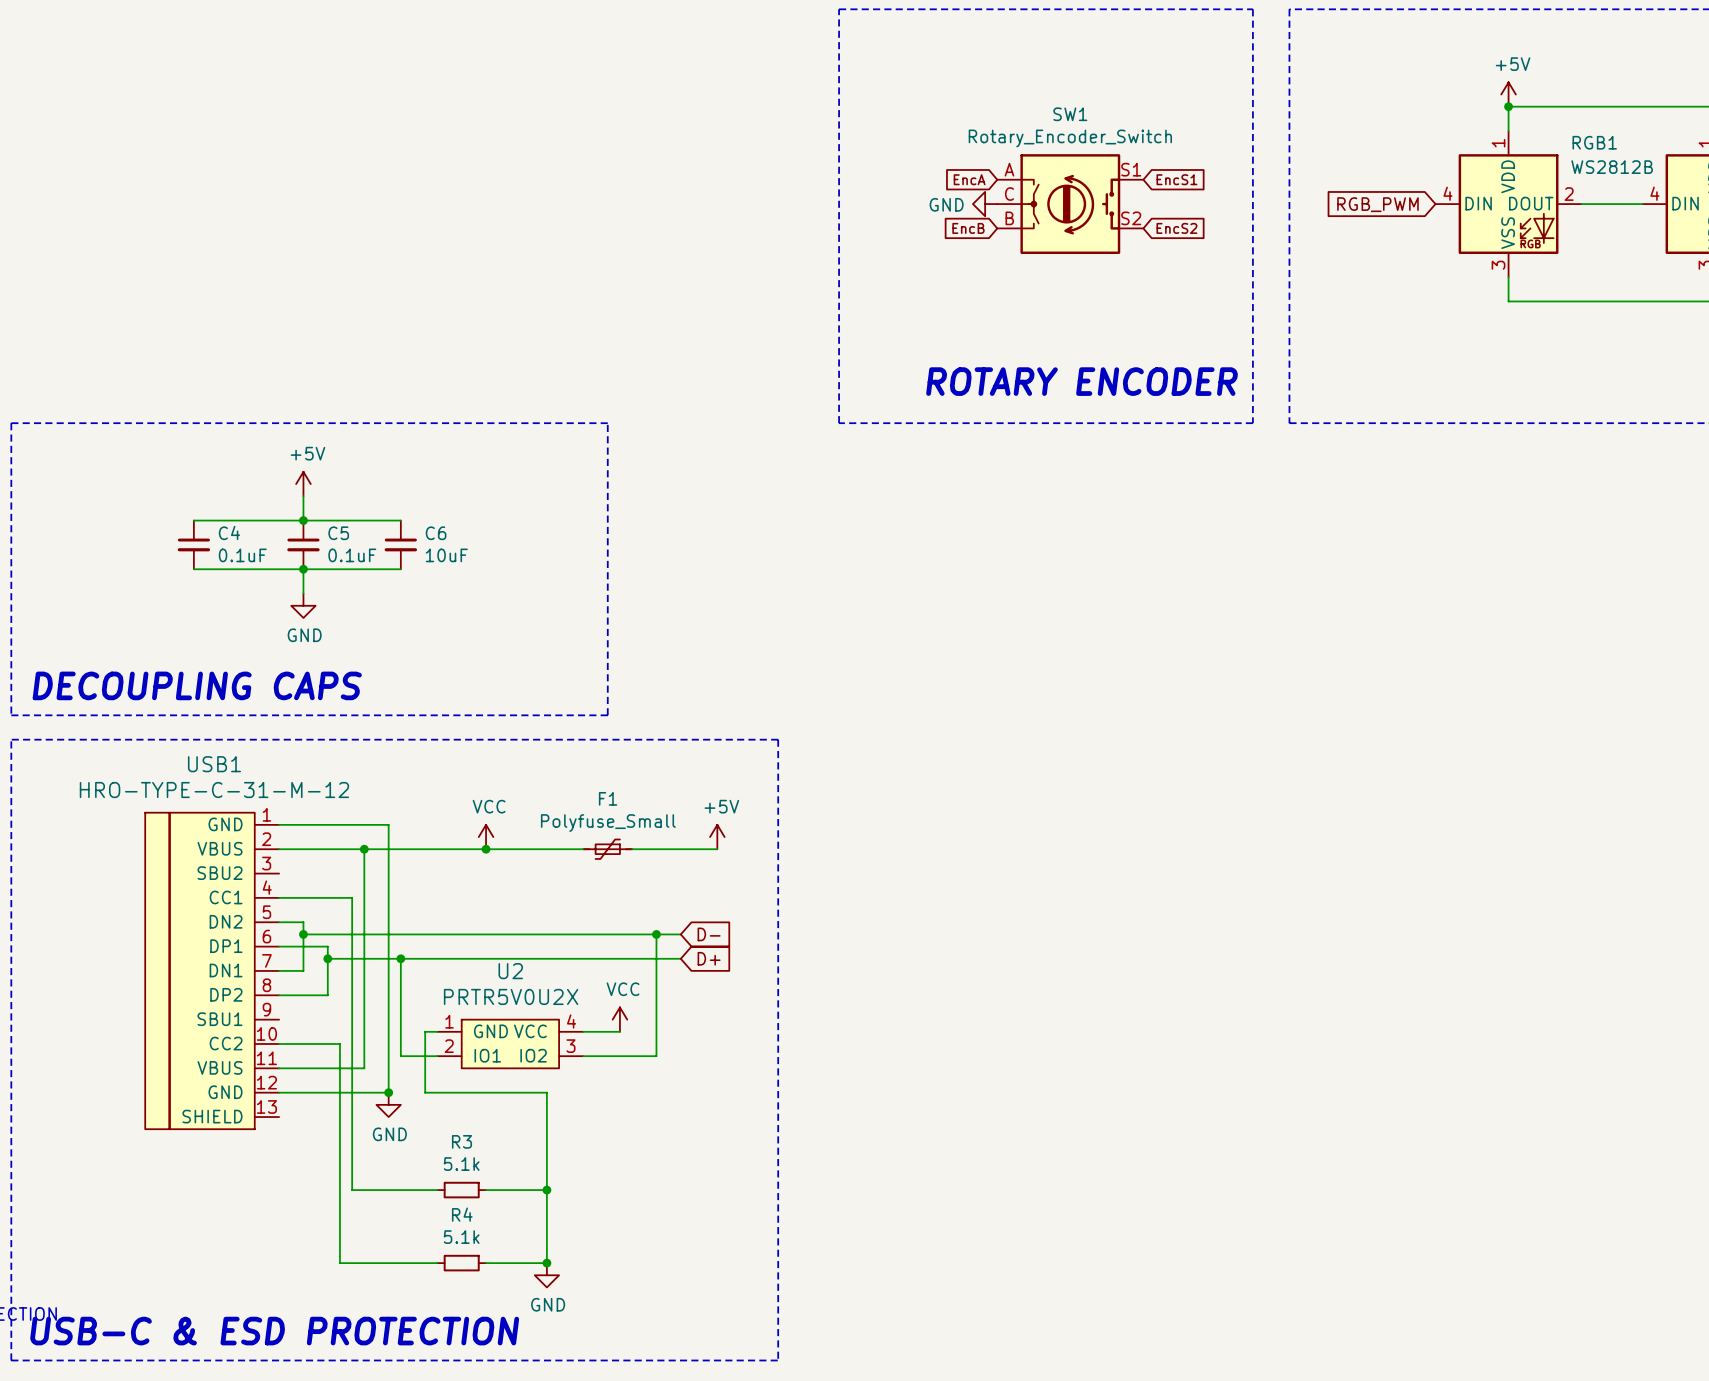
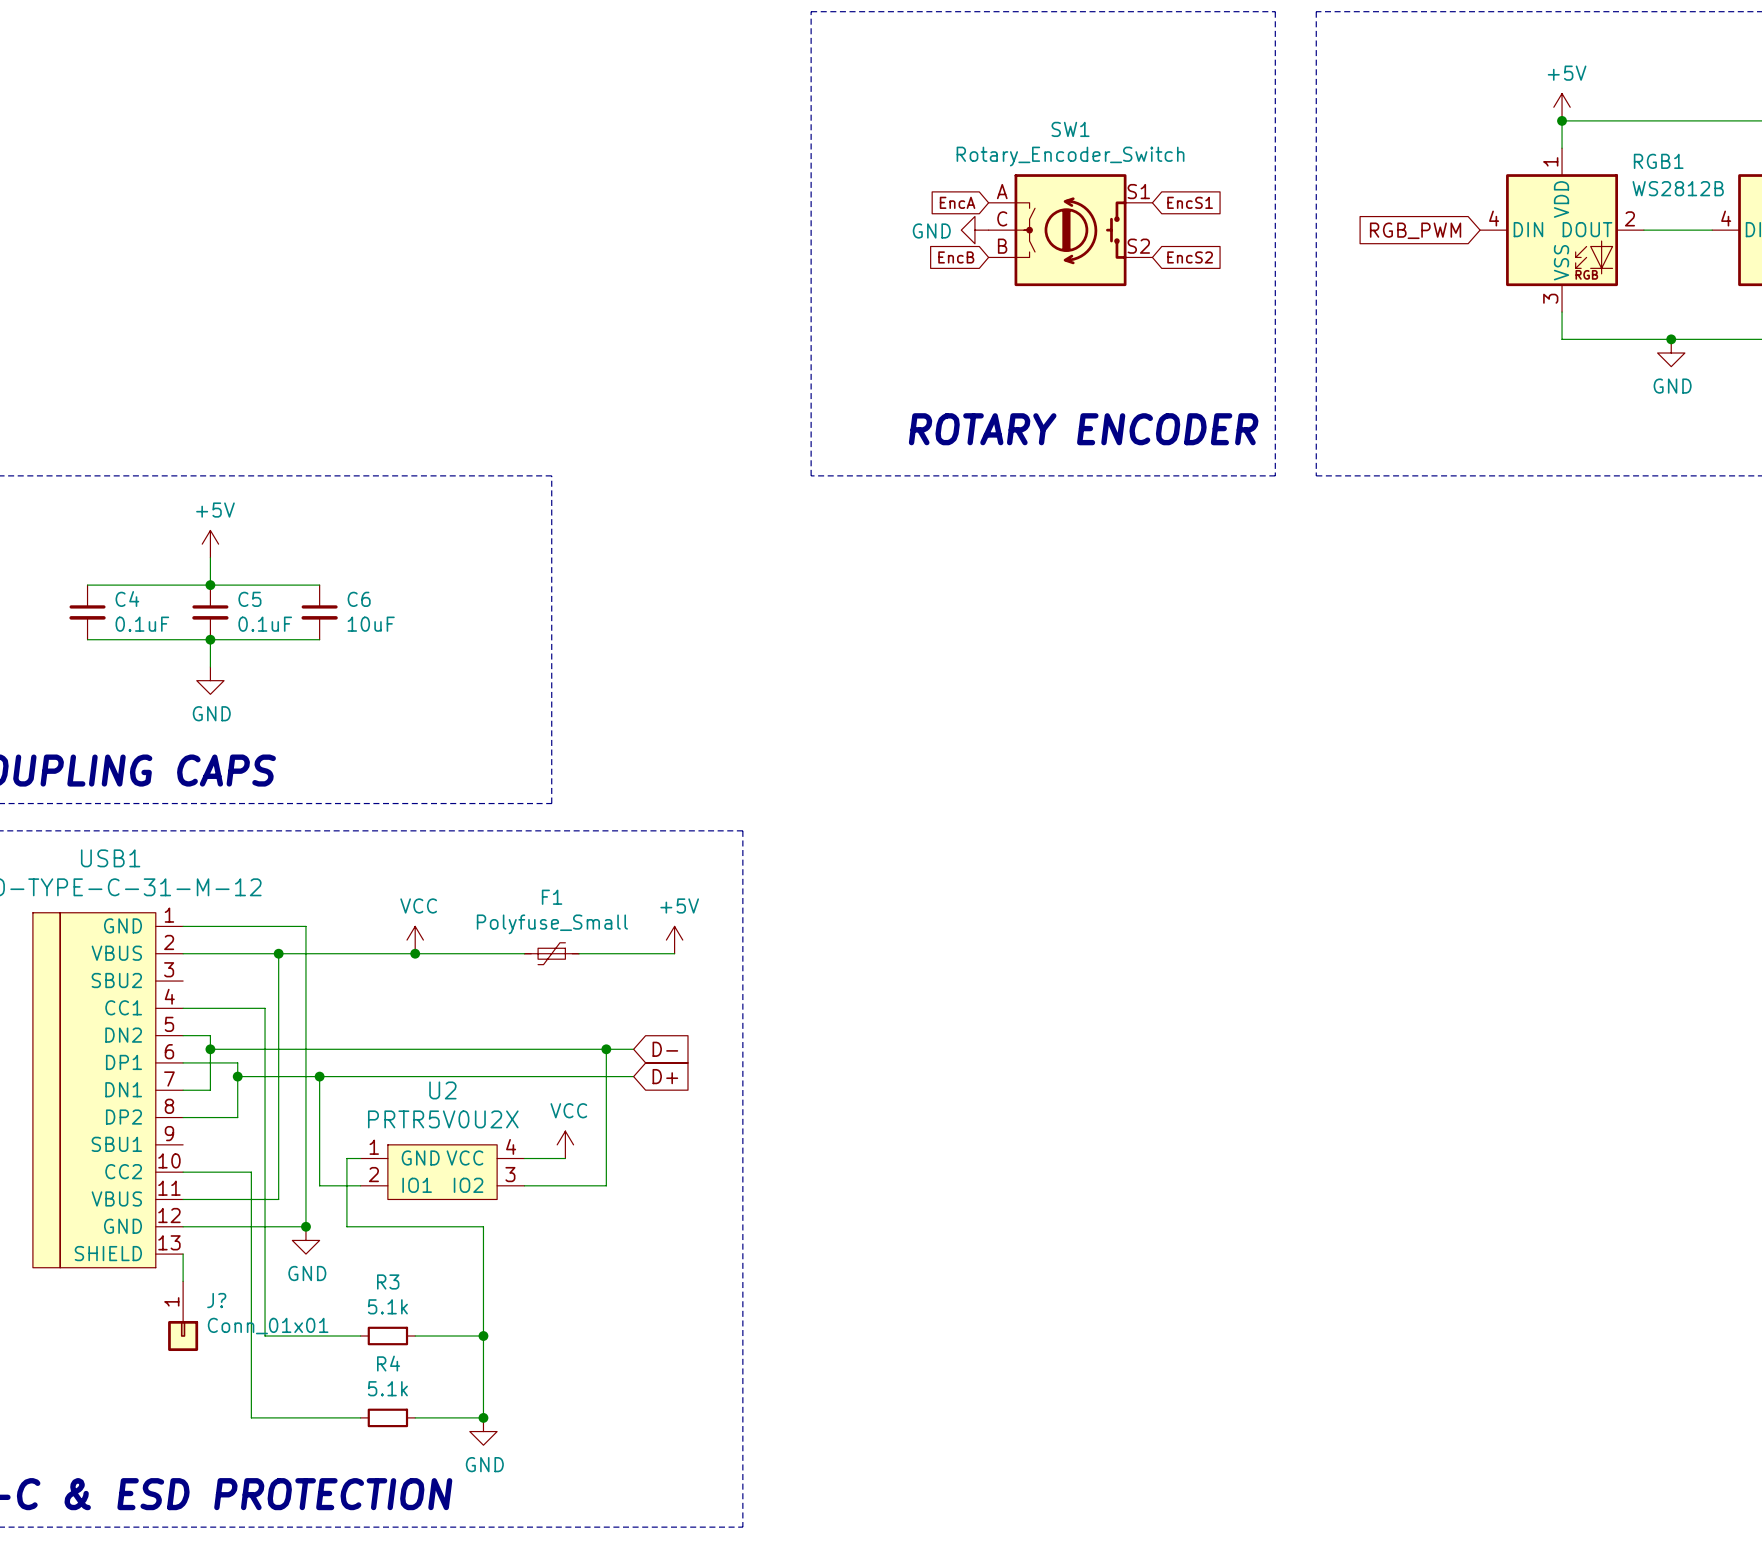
junction: none -> (1671, 339)
power symbol: none -> GND (1671, 353)
wire: none -> (183, 1254) (183, 1281)
J?: none -> Conn_01x01 (183, 1316)

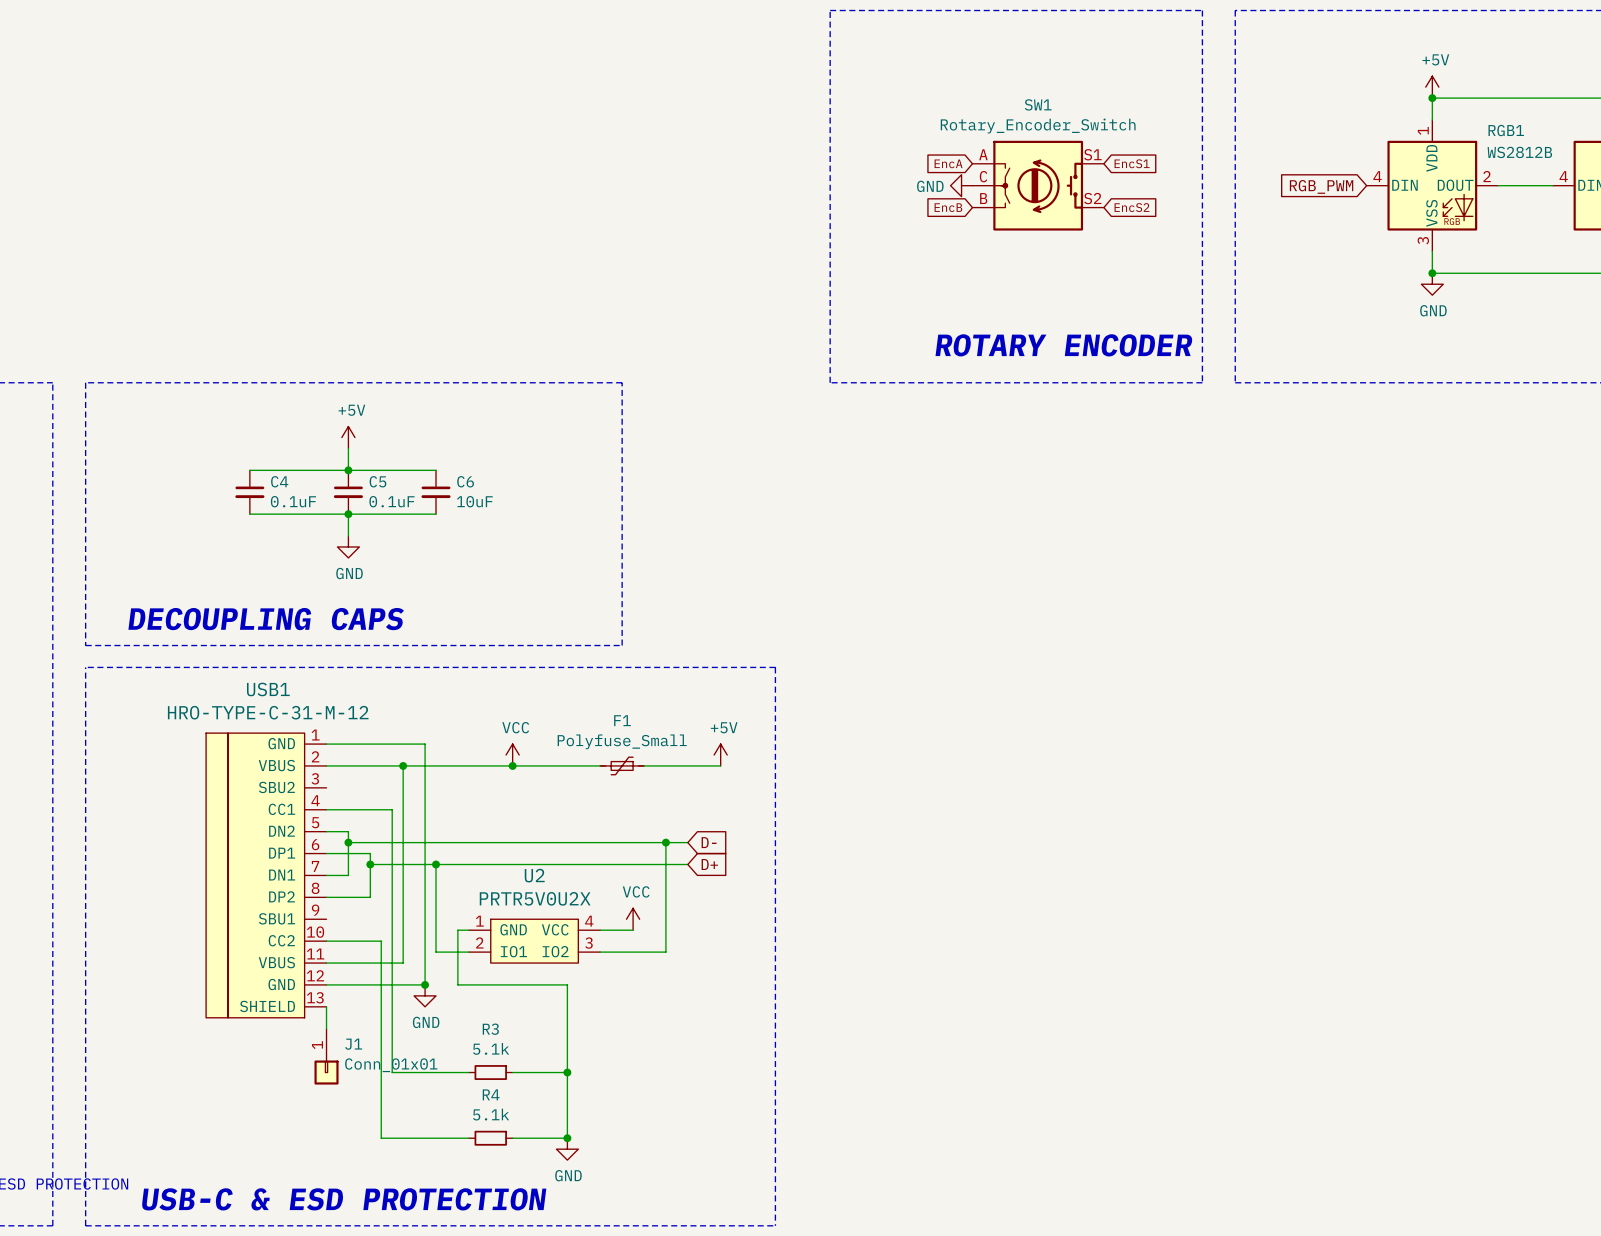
junction: none -> (1432, 273)
junction: (1671, 339) -> none
power symbol position: GND (1671, 353) -> GND (1432, 284)
J? name: J? (216, 1300) -> J1 (353, 1044)

